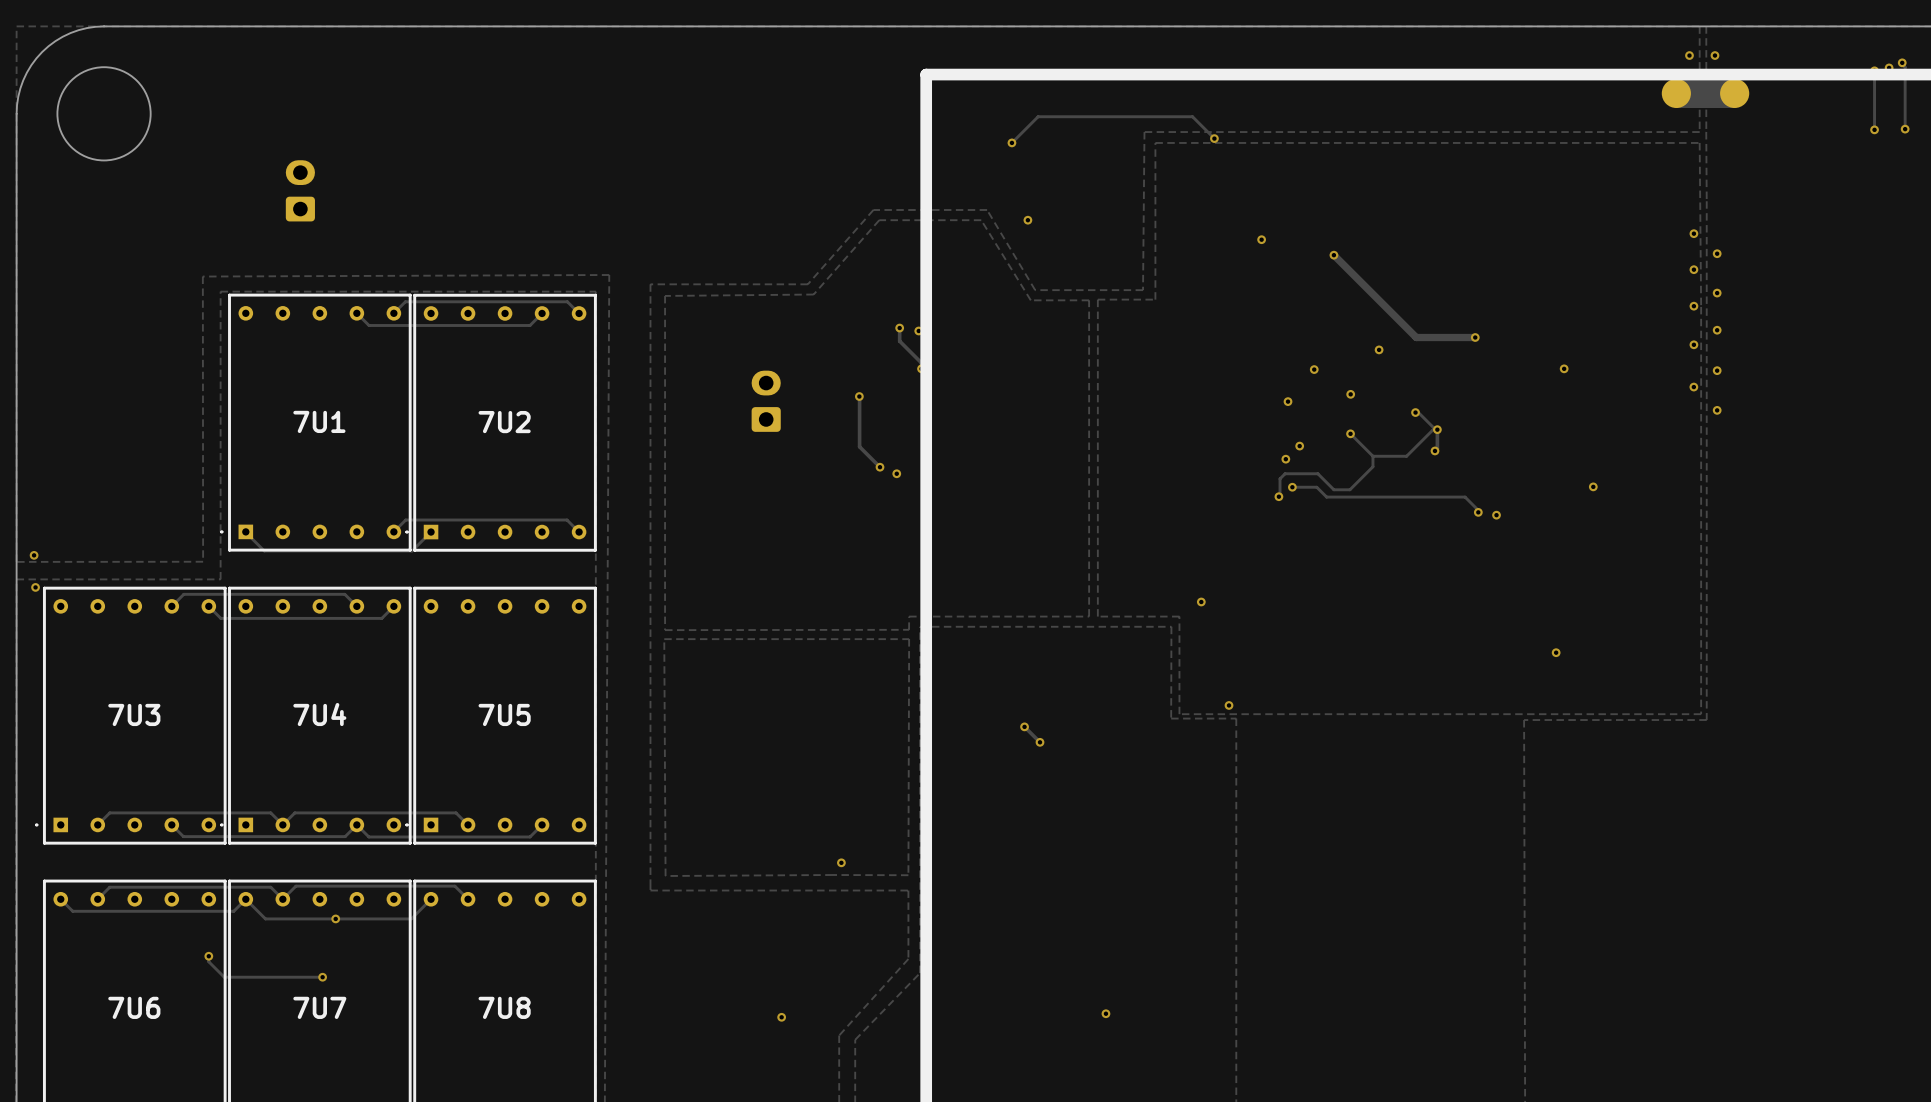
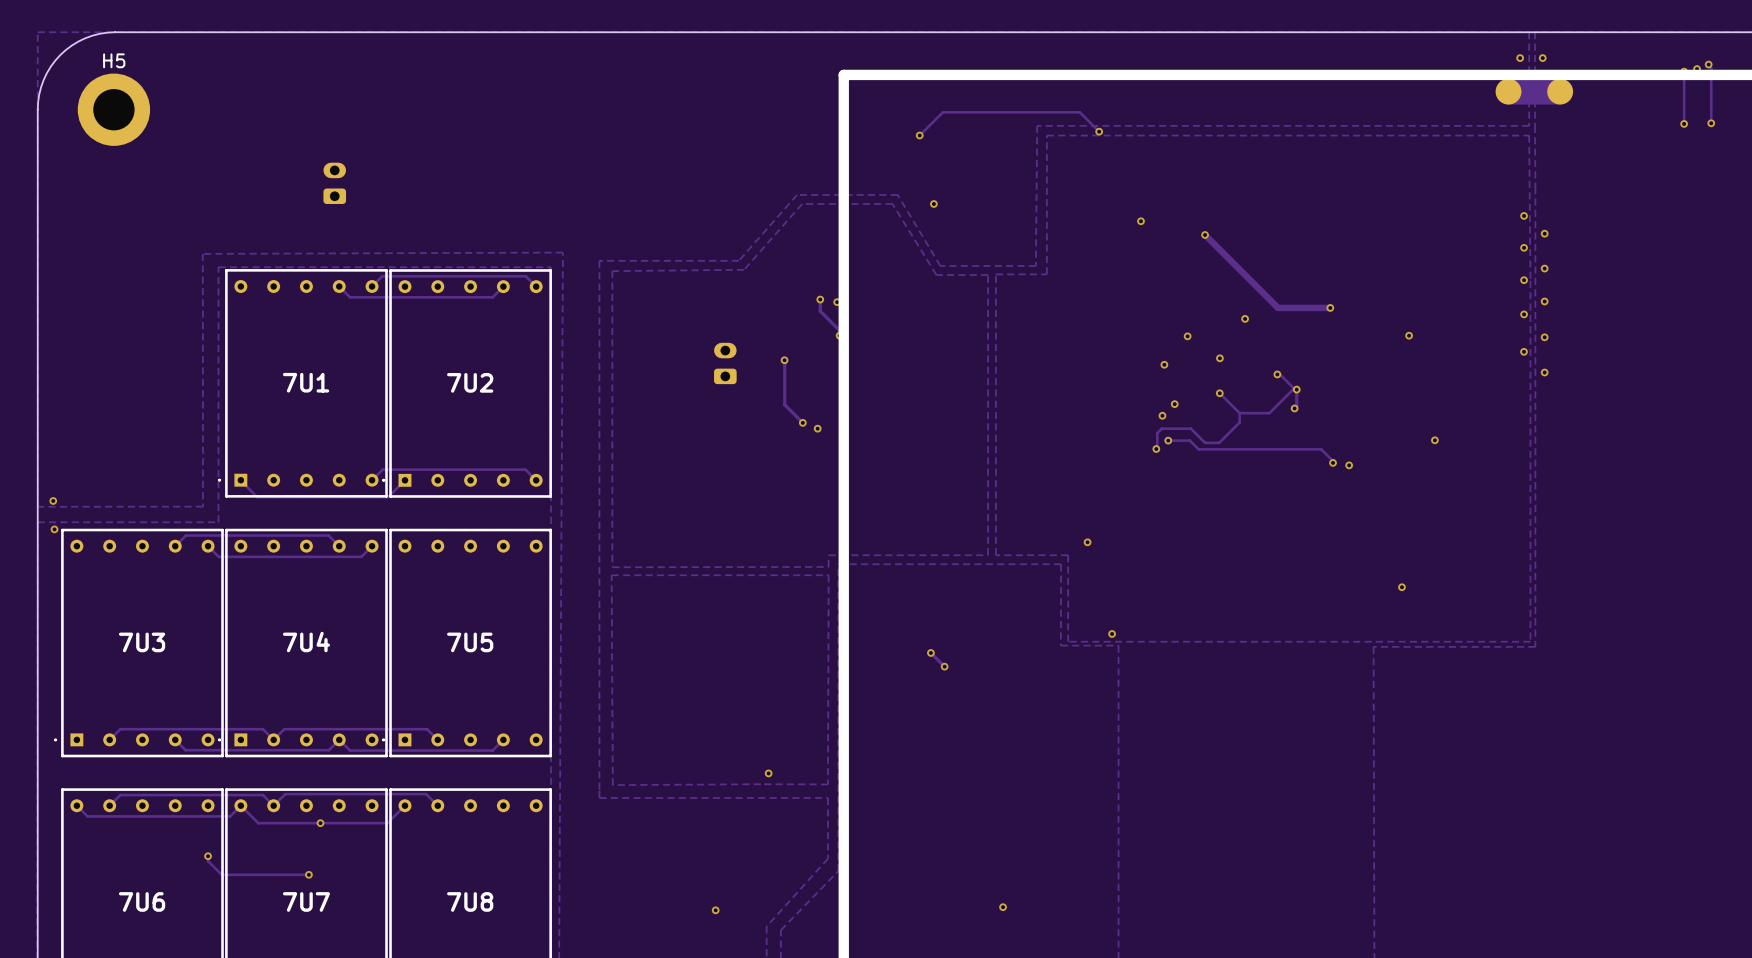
round board edge: [57, 66, 152, 161] -> none
H5: none -> (113, 109)
part: (300, 190) -> none
part: none -> (334, 183)
part: none -> (725, 363)
part: (766, 401) -> none

